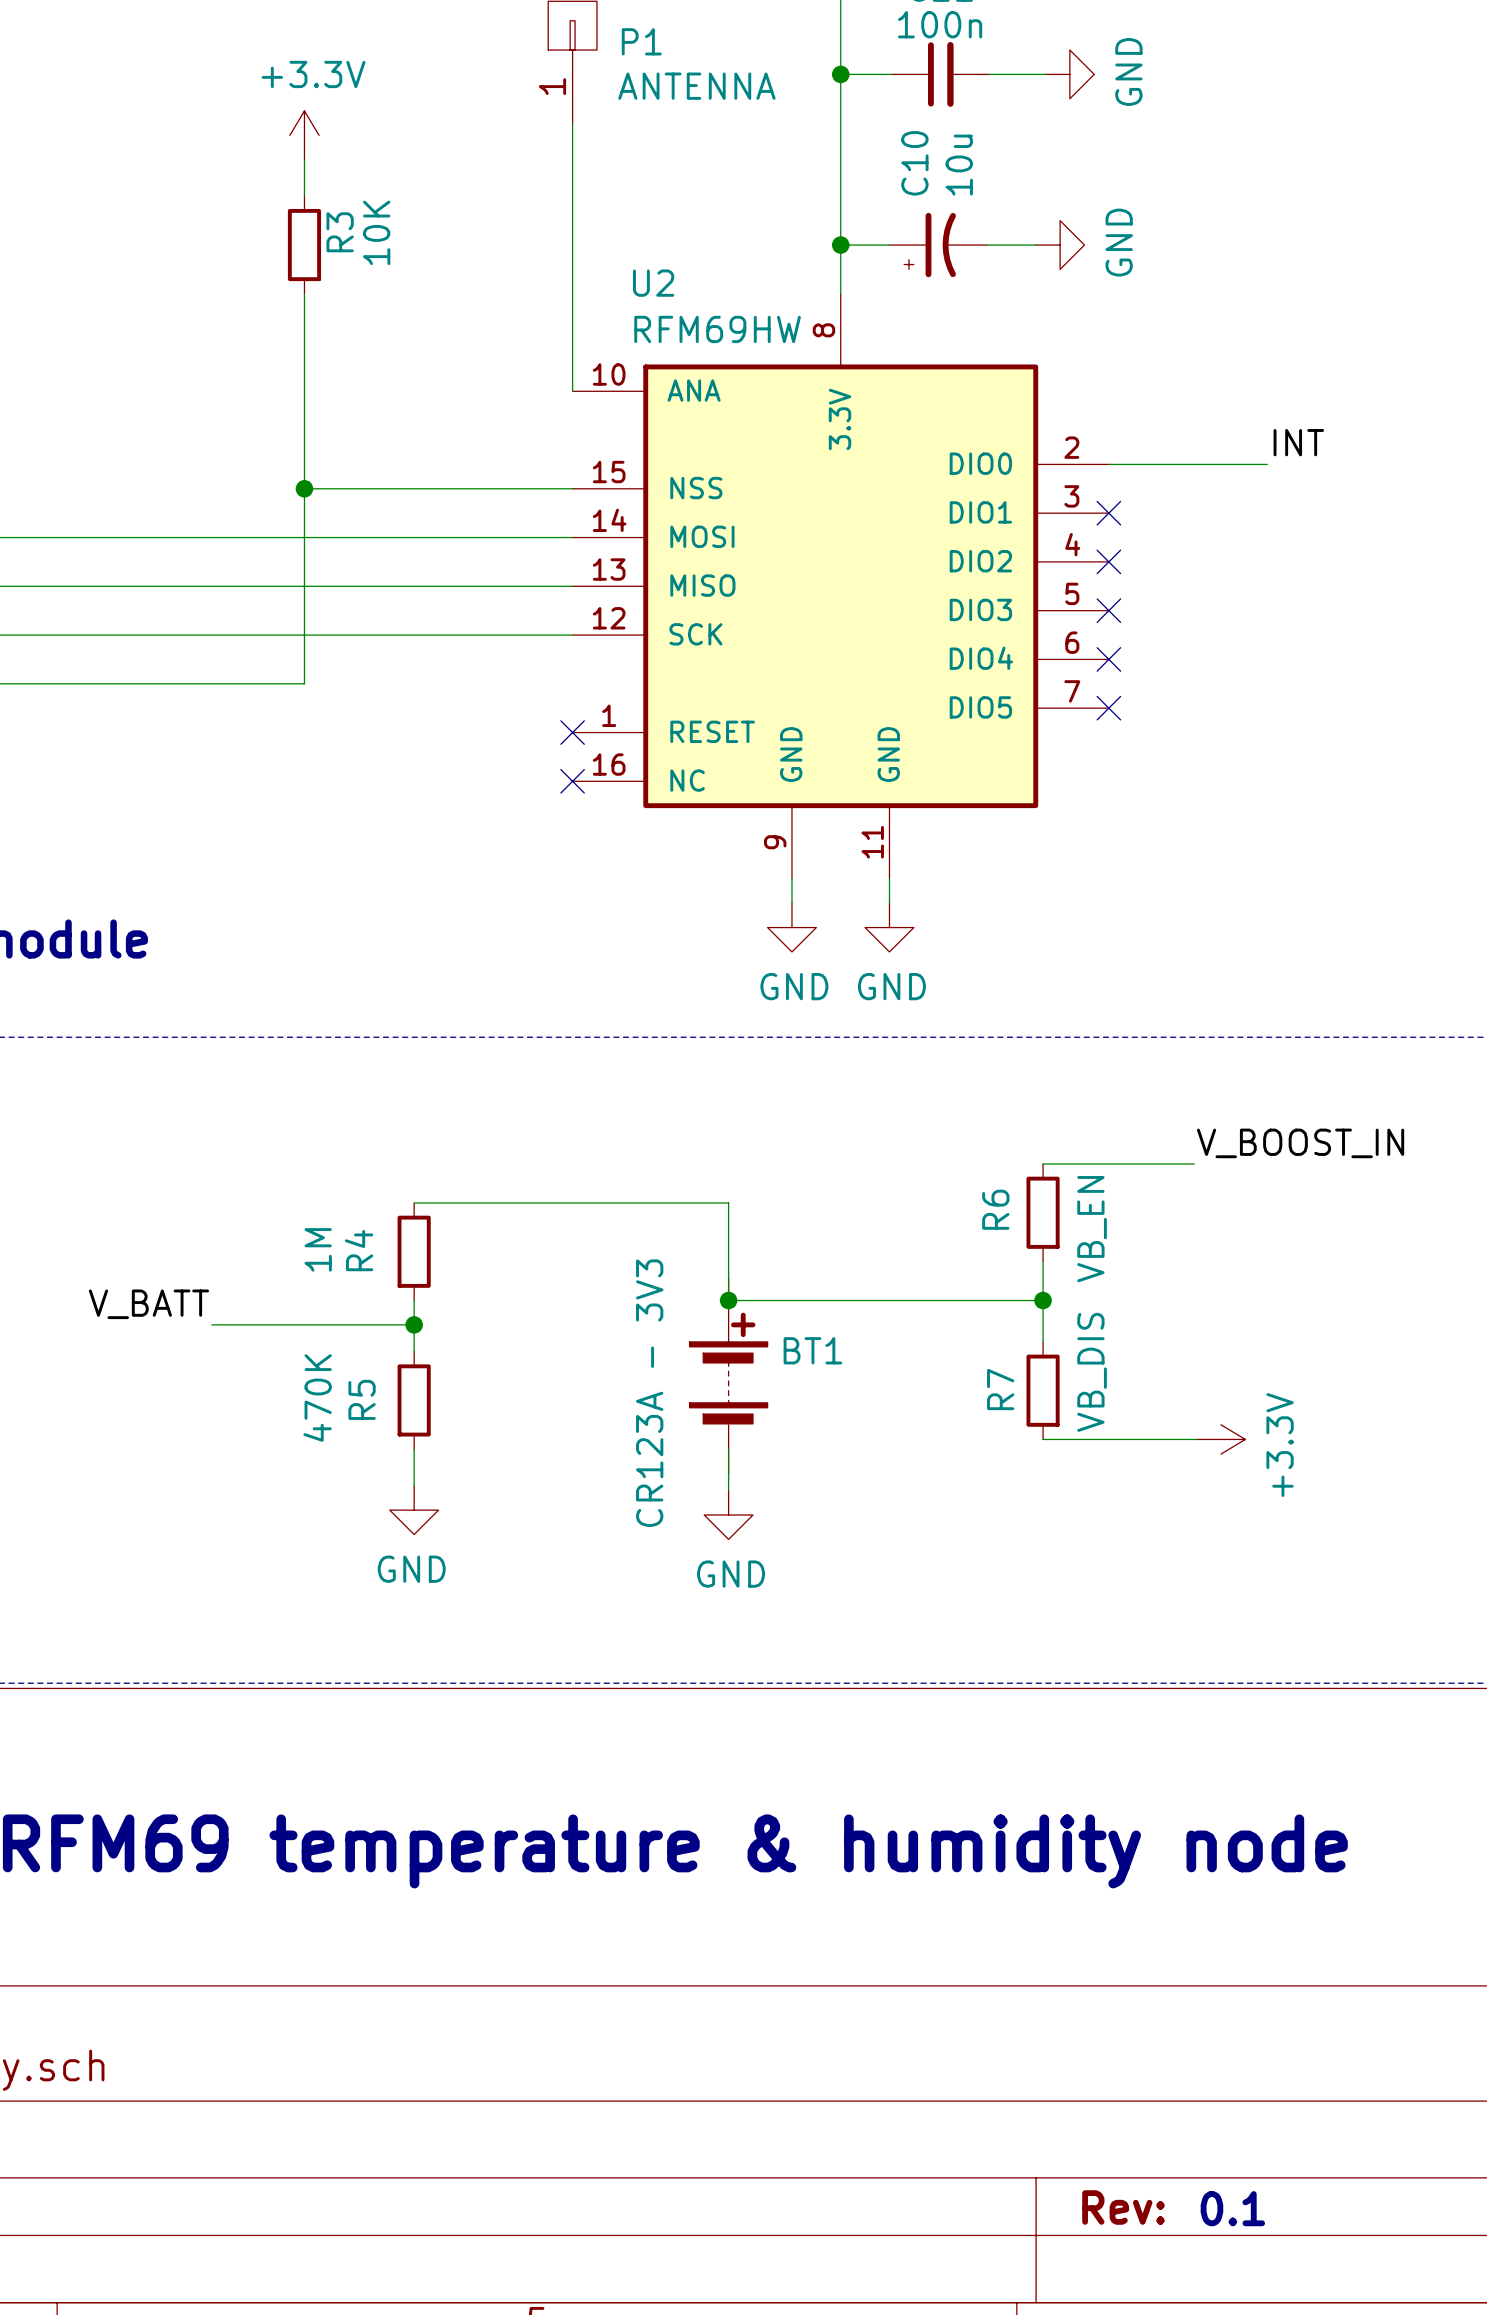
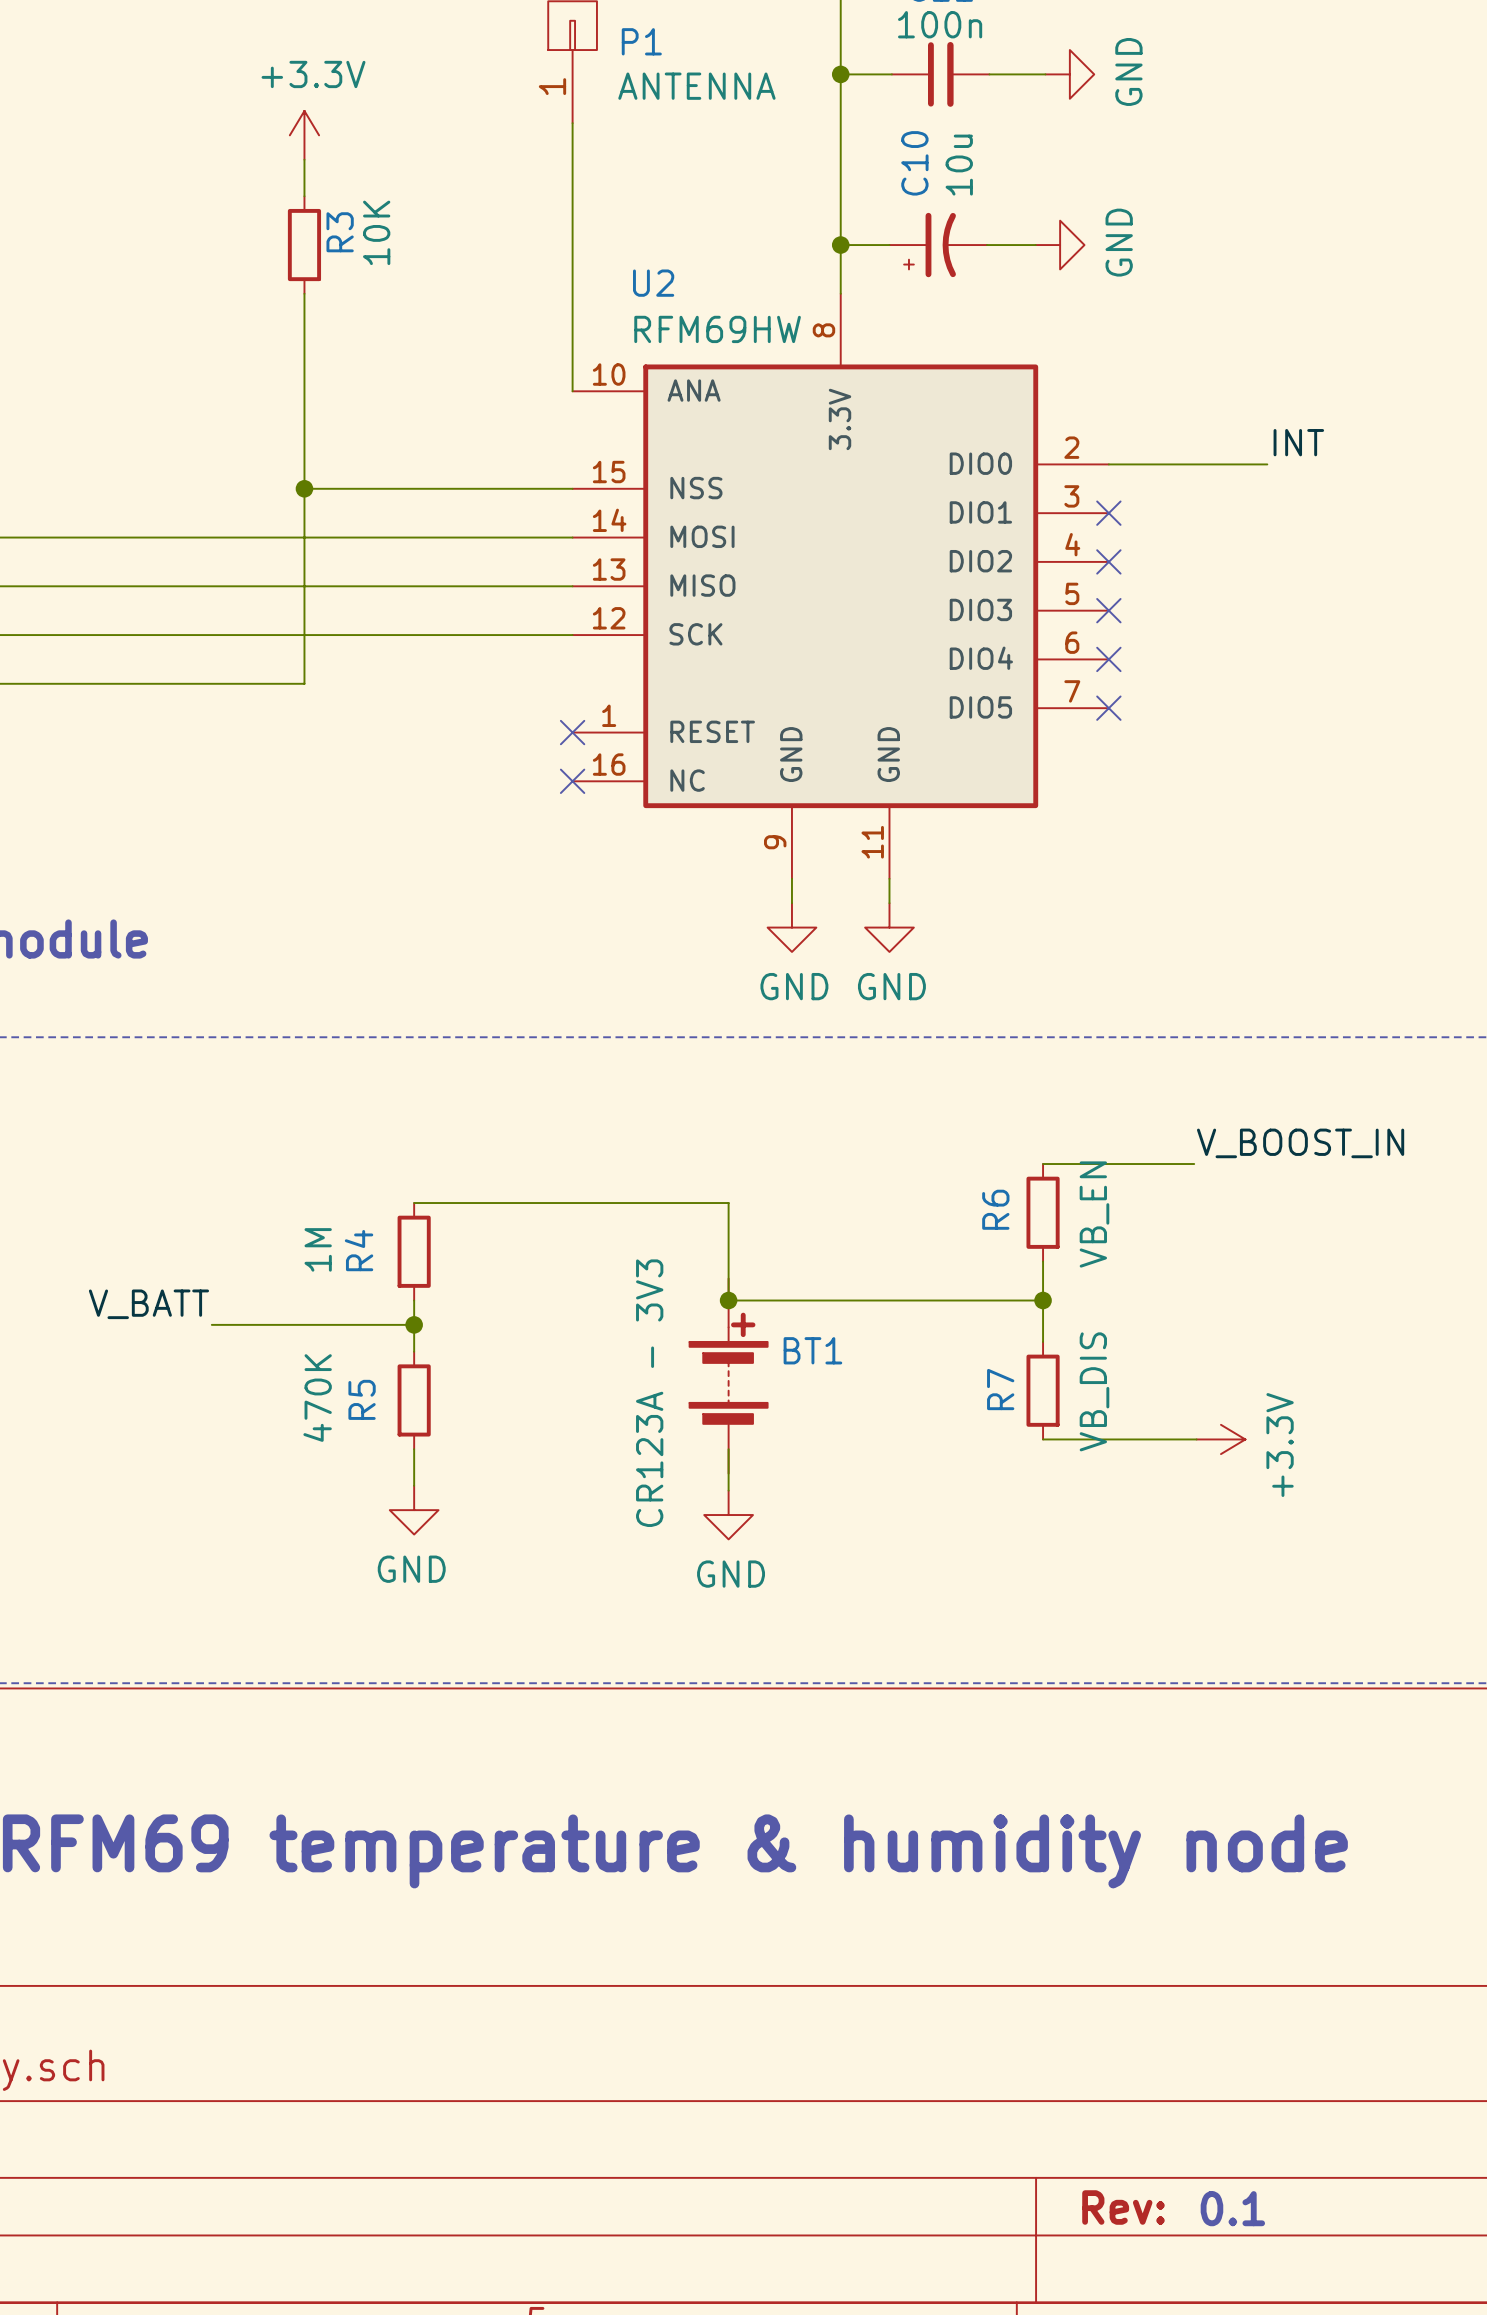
R6 value position: VB_EN (1092, 1229) -> VB_EN (1094, 1214)
R7 value position: VB_DIS (1092, 1372) -> VB_DIS (1094, 1391)

